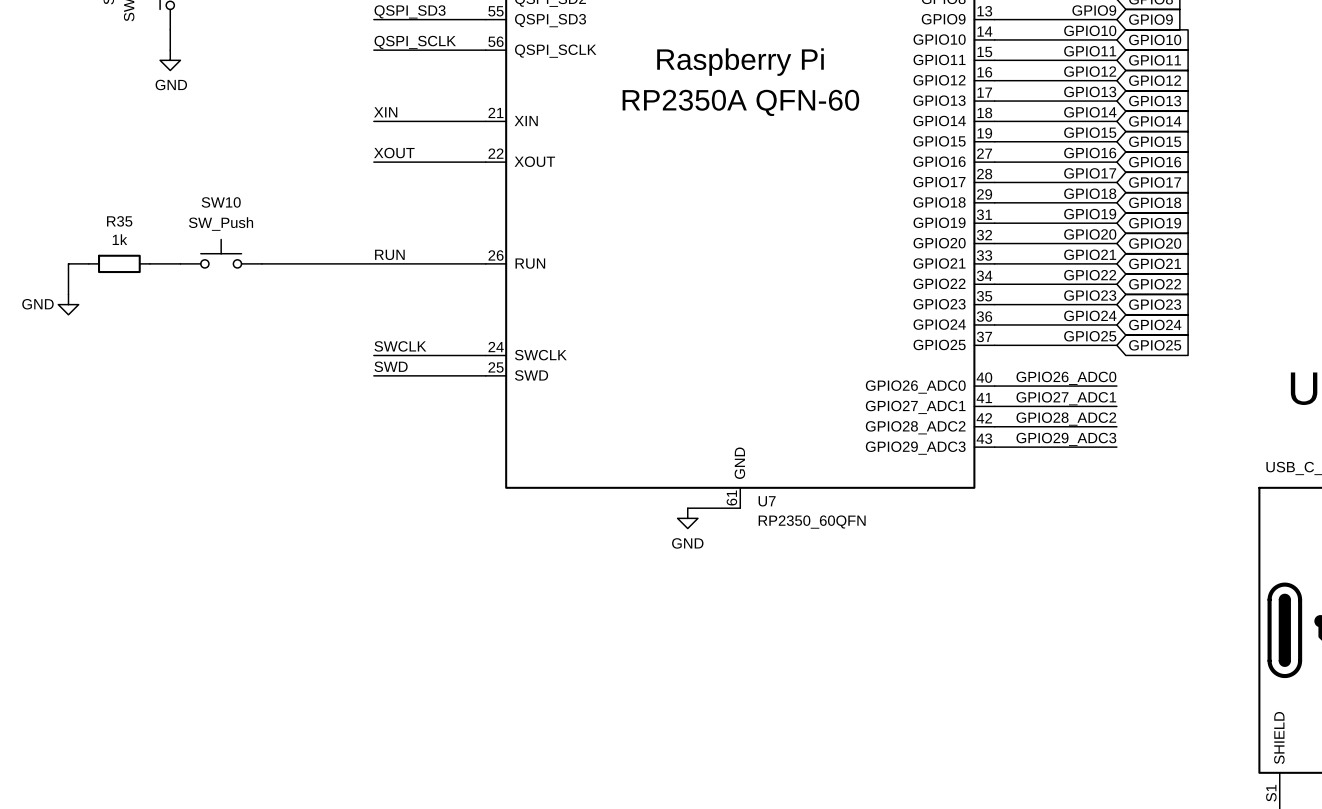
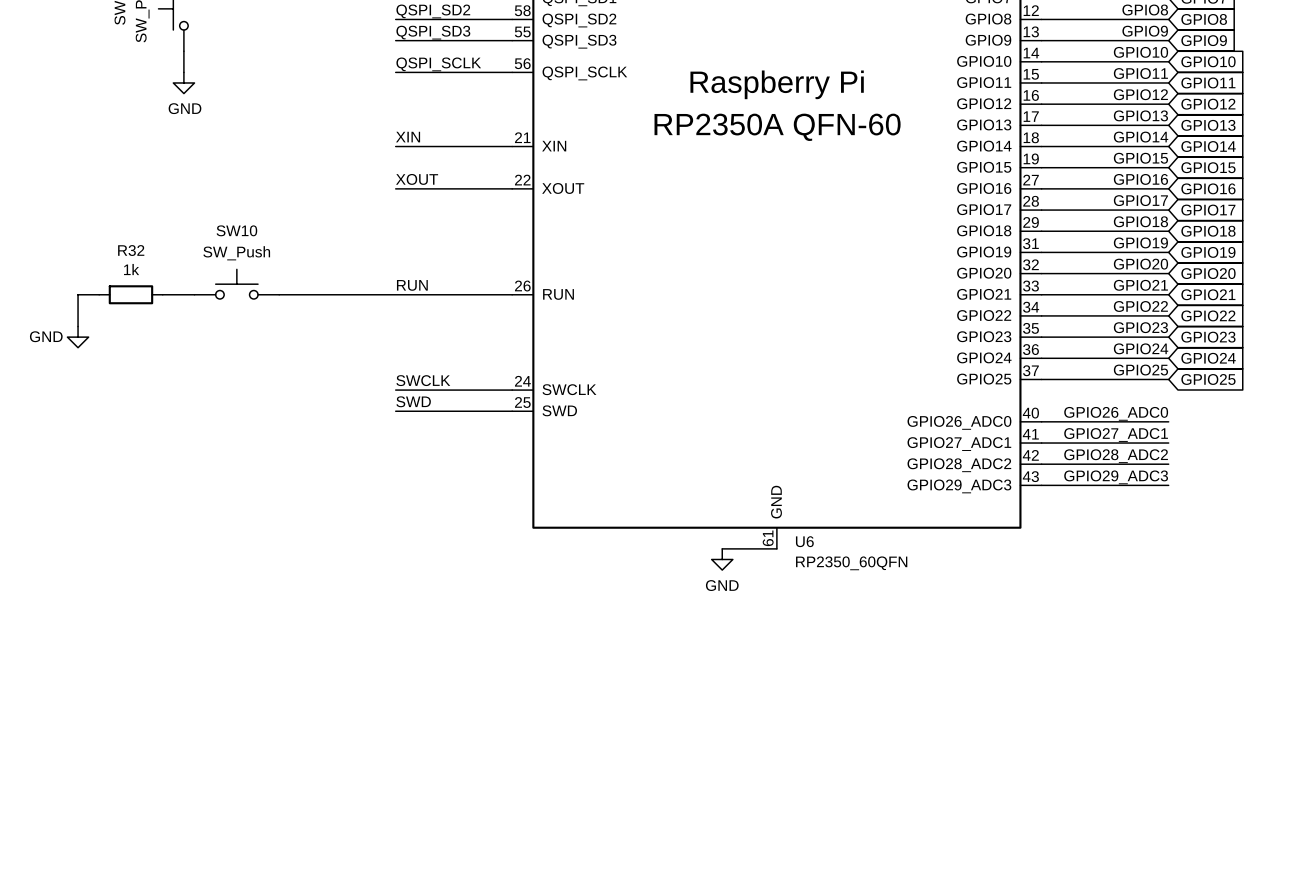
R35 name: R35 (119, 221) -> R32 (131, 250)
U7 name: U7 (767, 501) -> U6 (804, 541)

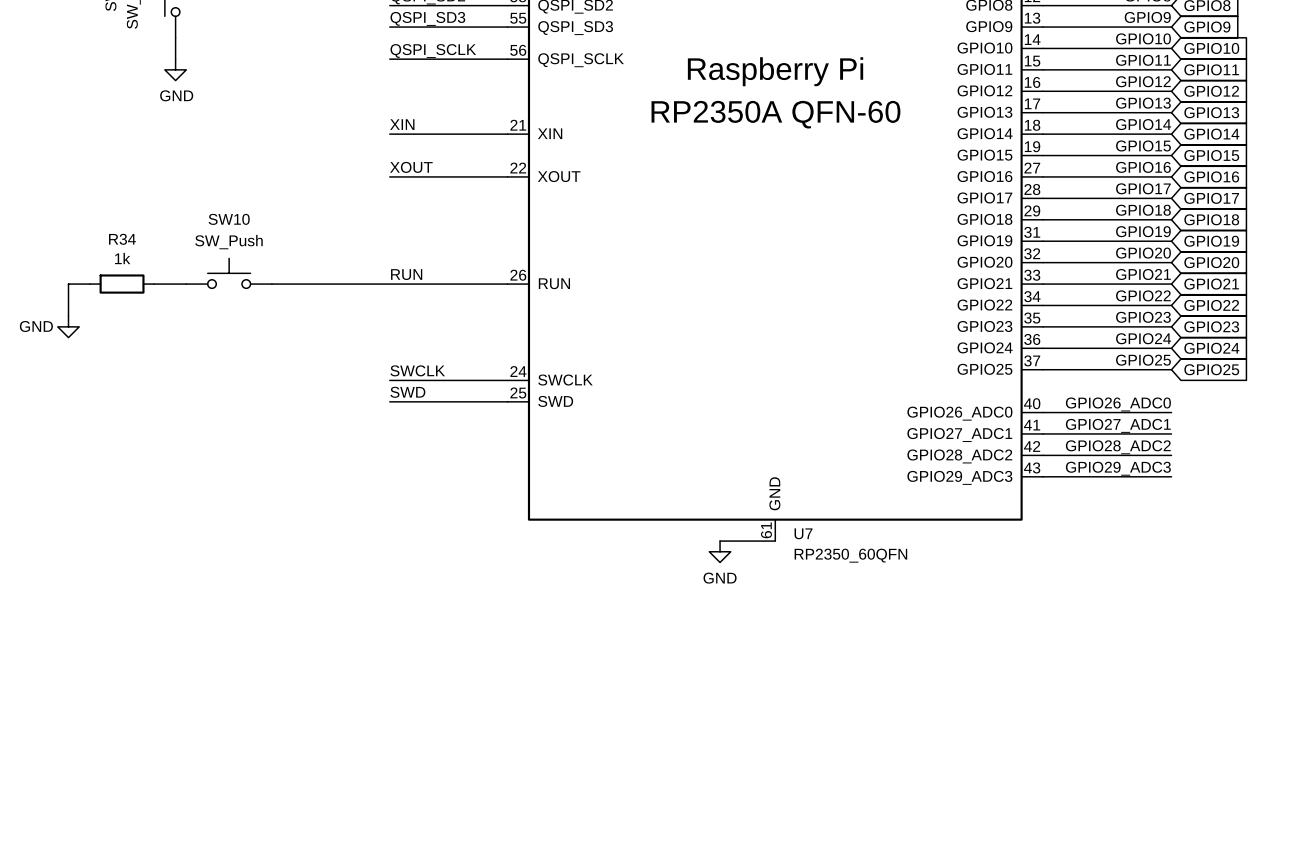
R32 name: R32 (131, 250) -> R34 (122, 239)
U6 name: U6 (804, 541) -> U7 (803, 533)

